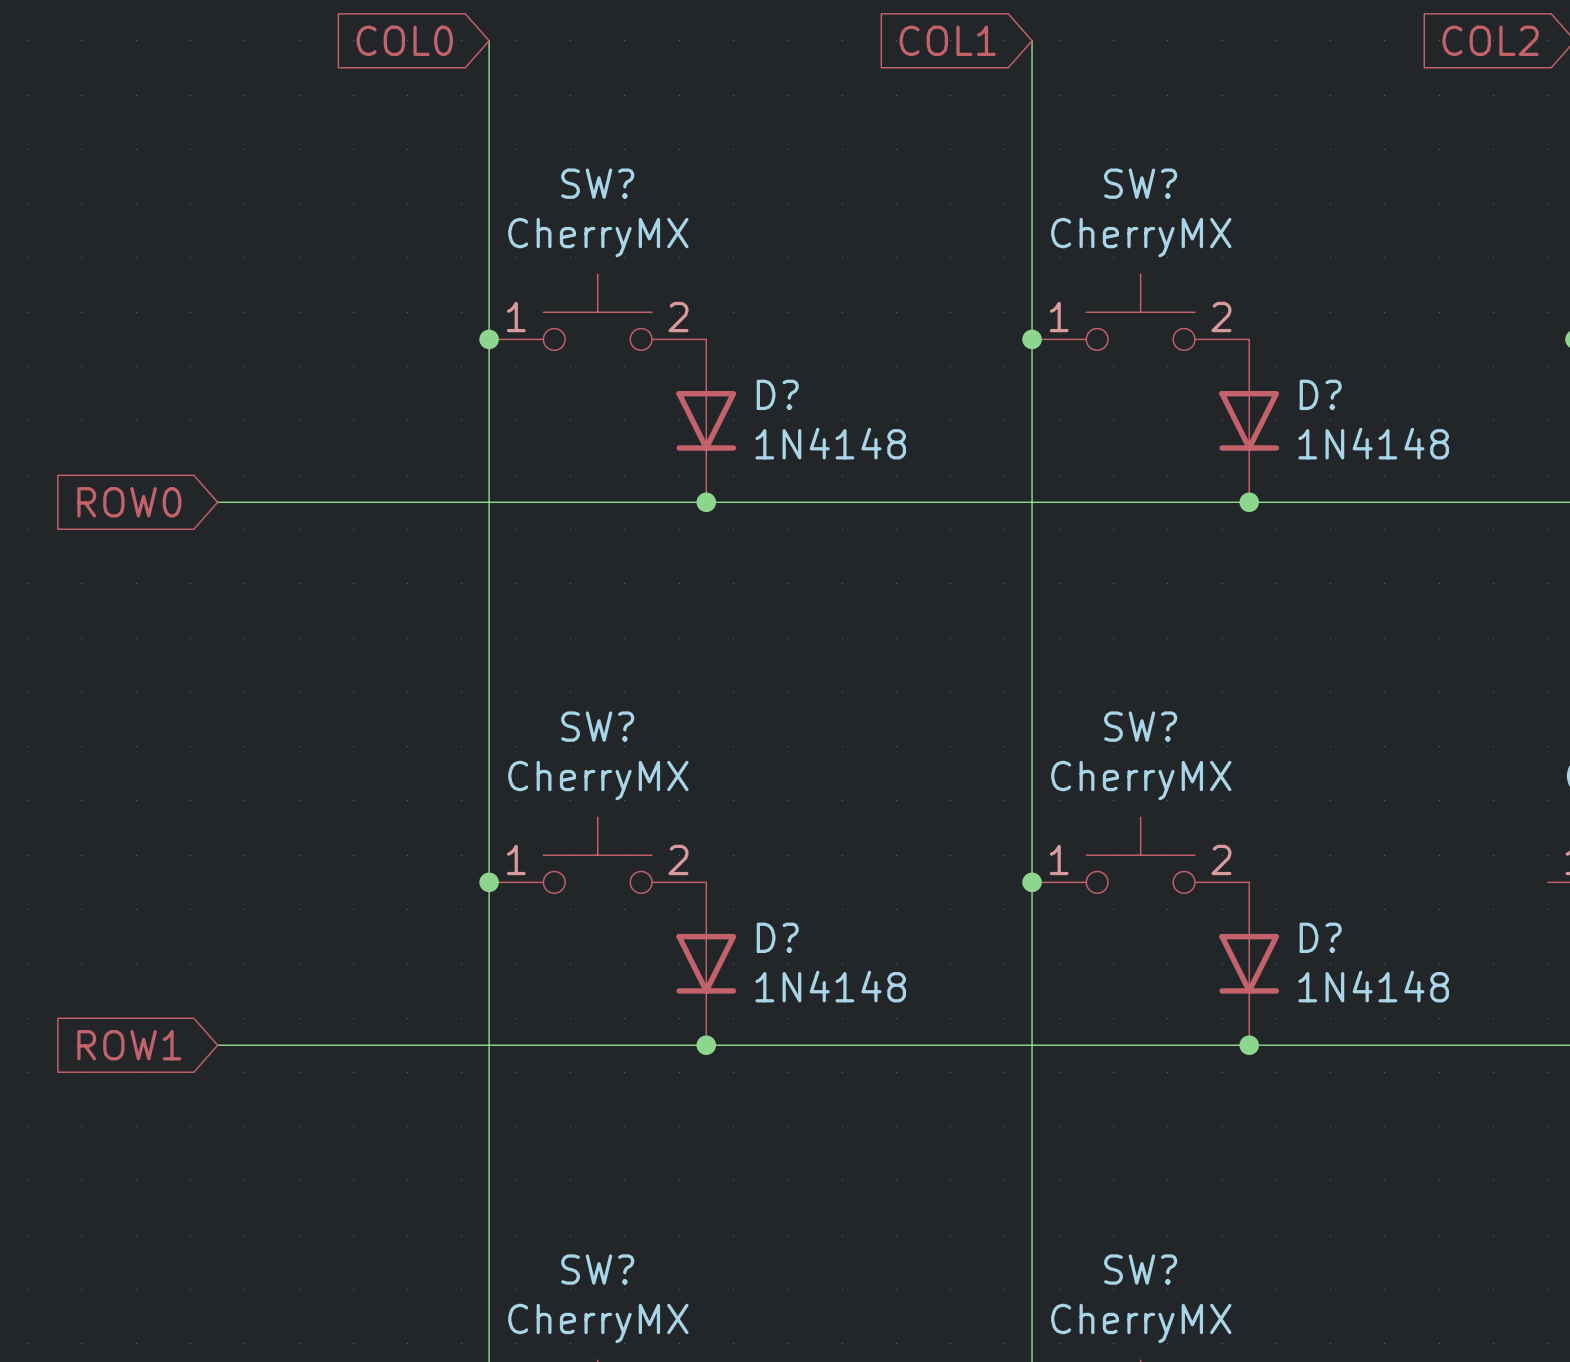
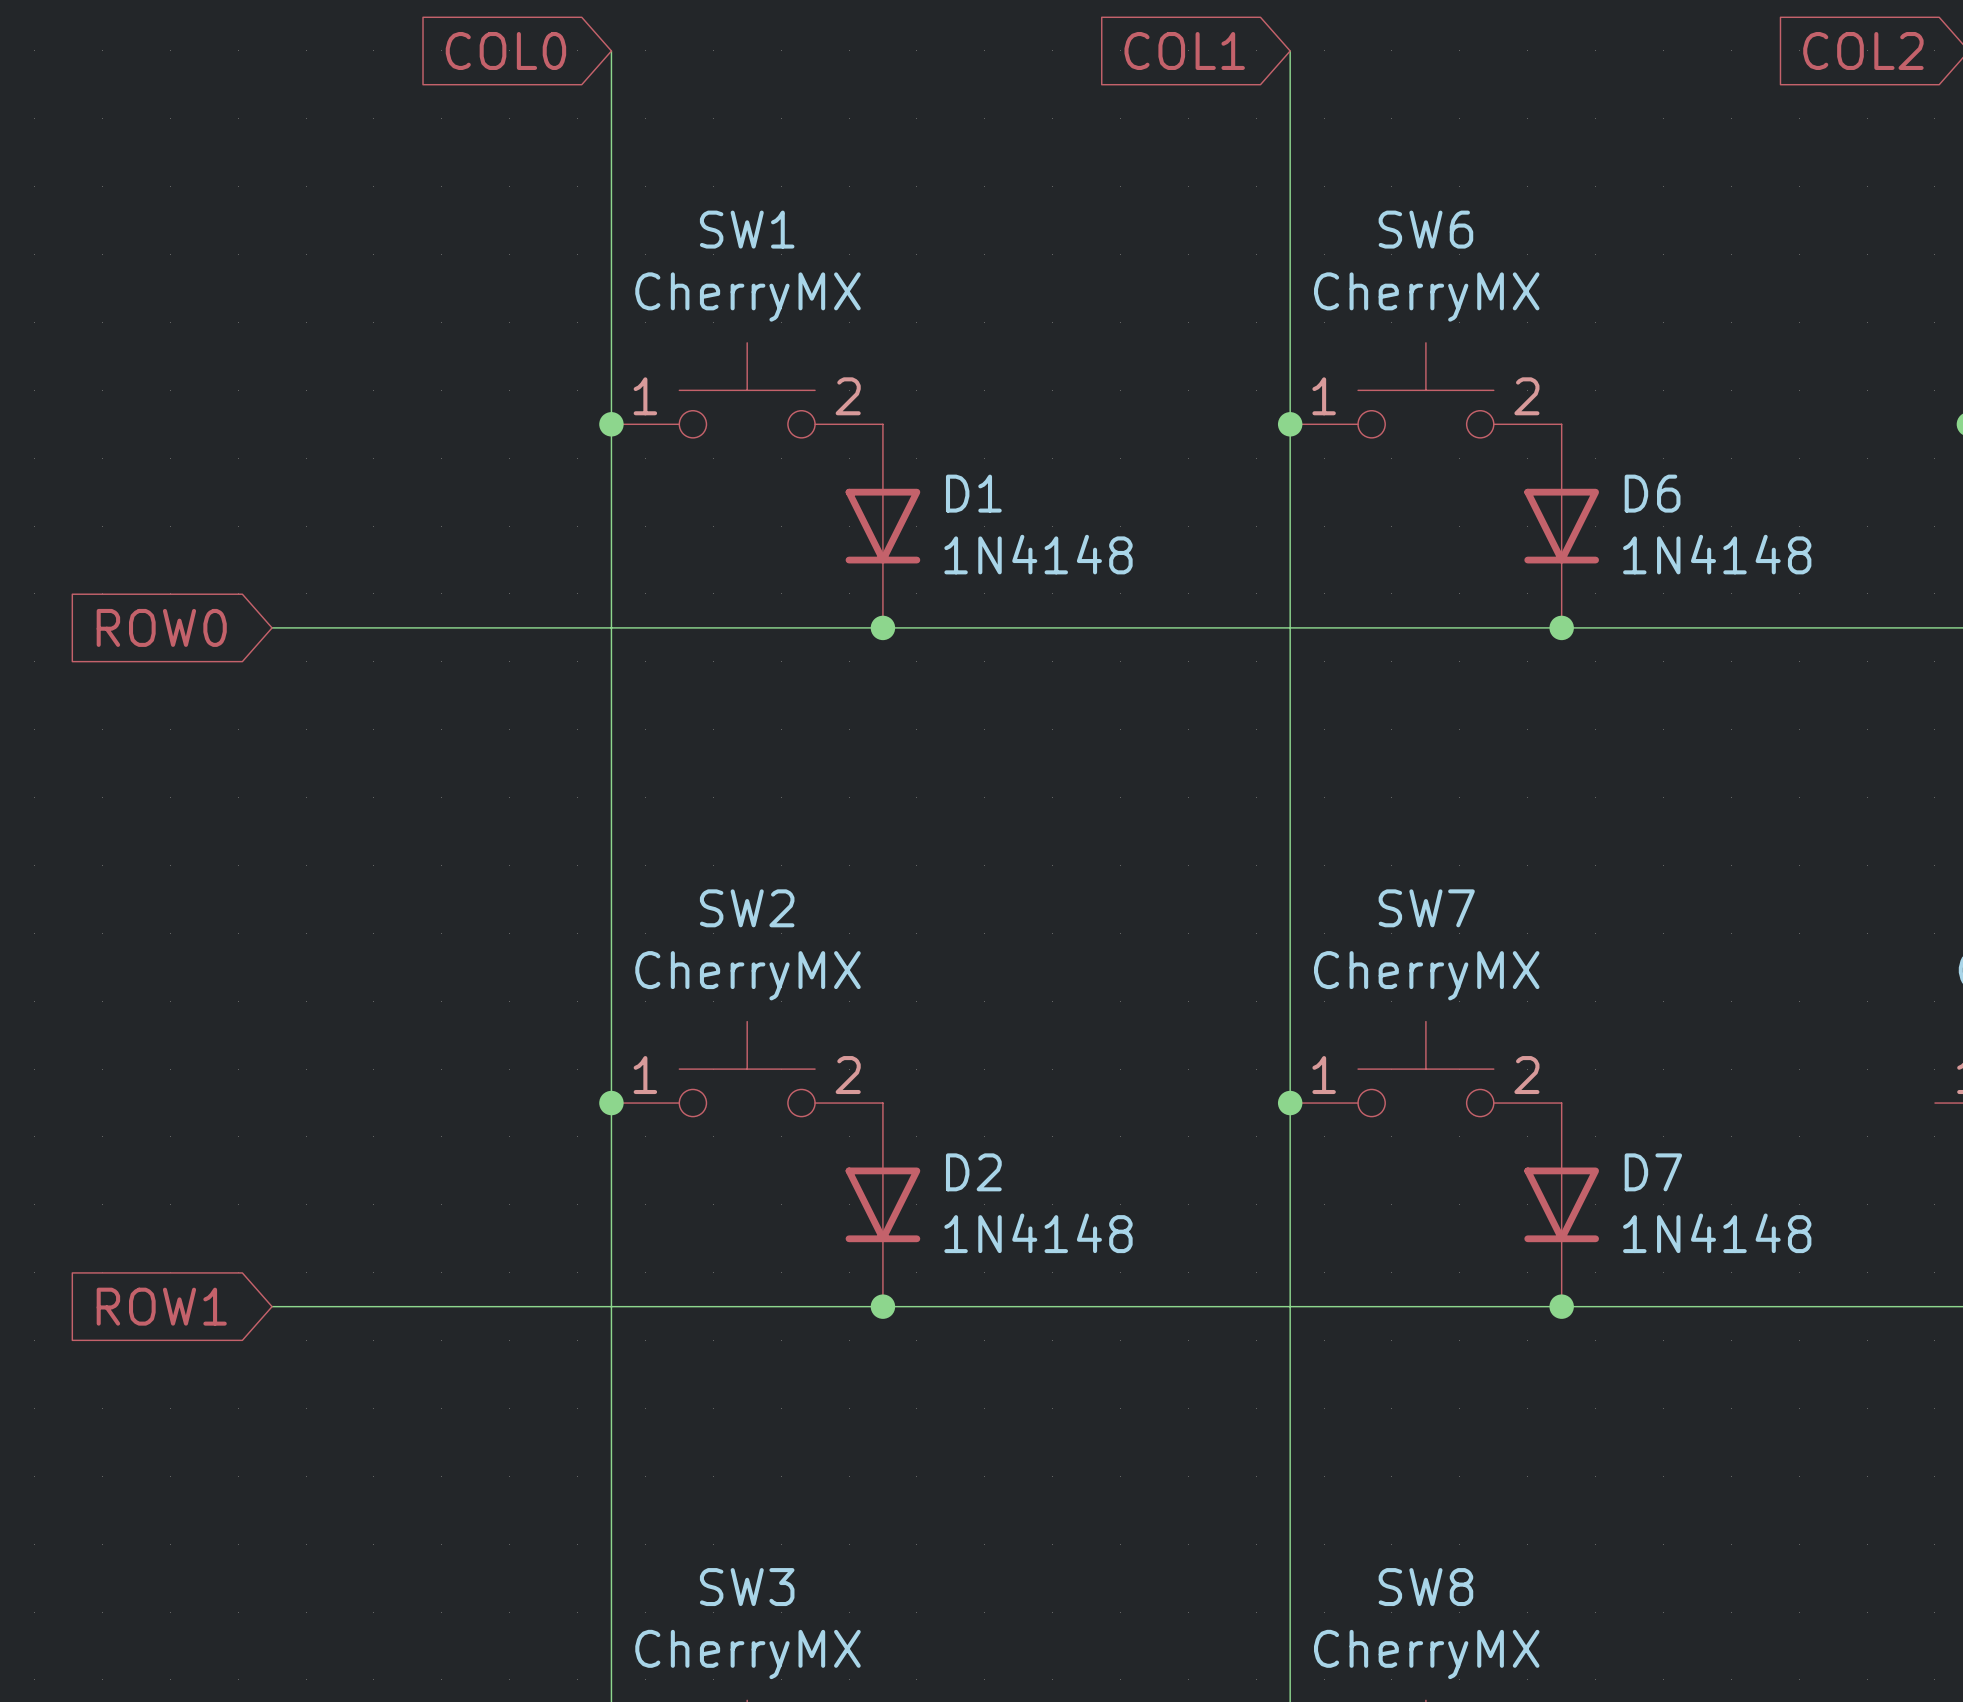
SW? name: SW? (597, 183) -> SW1 (747, 229)
SW? name: SW? (1140, 183) -> SW6 (1425, 229)
D? name: D? (777, 394) -> D1 (973, 493)
D? name: D? (1320, 394) -> D6 (1652, 493)
SW? name: SW? (597, 726) -> SW2 (747, 908)
SW? name: SW? (1140, 726) -> SW7 (1426, 908)
D? name: D? (777, 937) -> D2 (973, 1172)
D? name: D? (1320, 937) -> D7 (1653, 1172)
SW? name: SW? (597, 1269) -> SW3 (747, 1587)
SW? name: SW? (1140, 1269) -> SW8 (1425, 1587)

